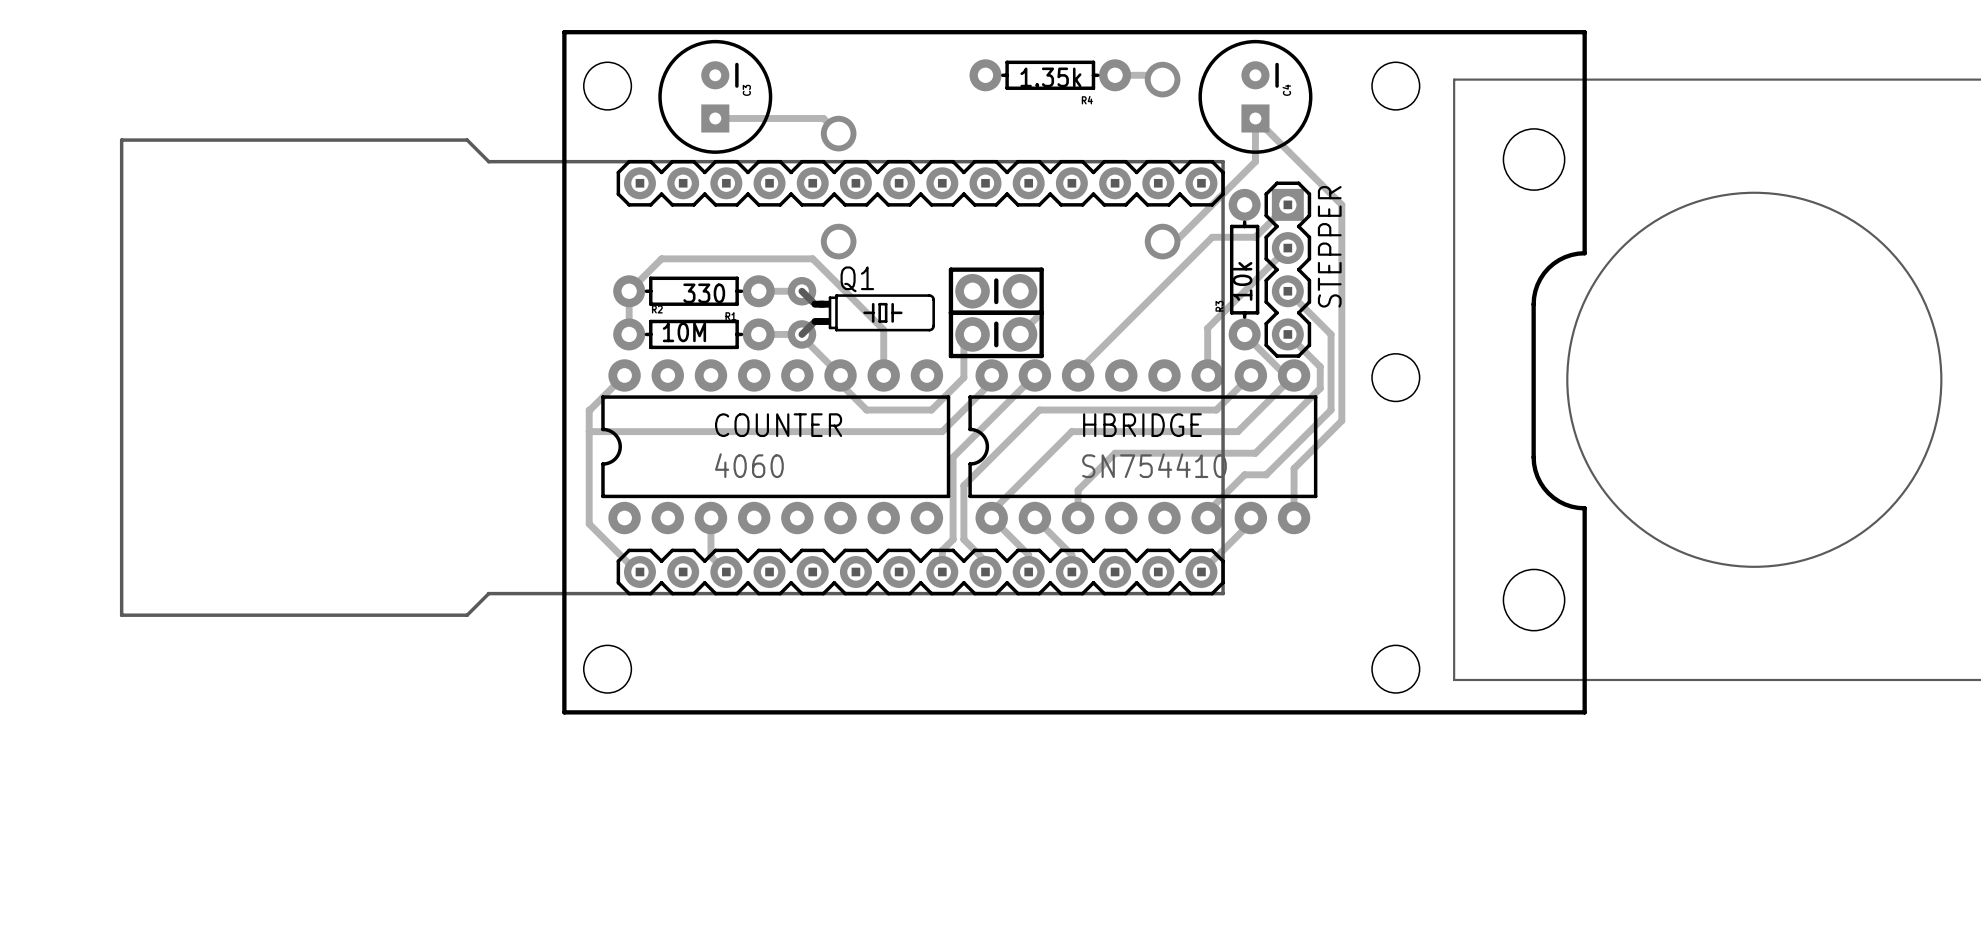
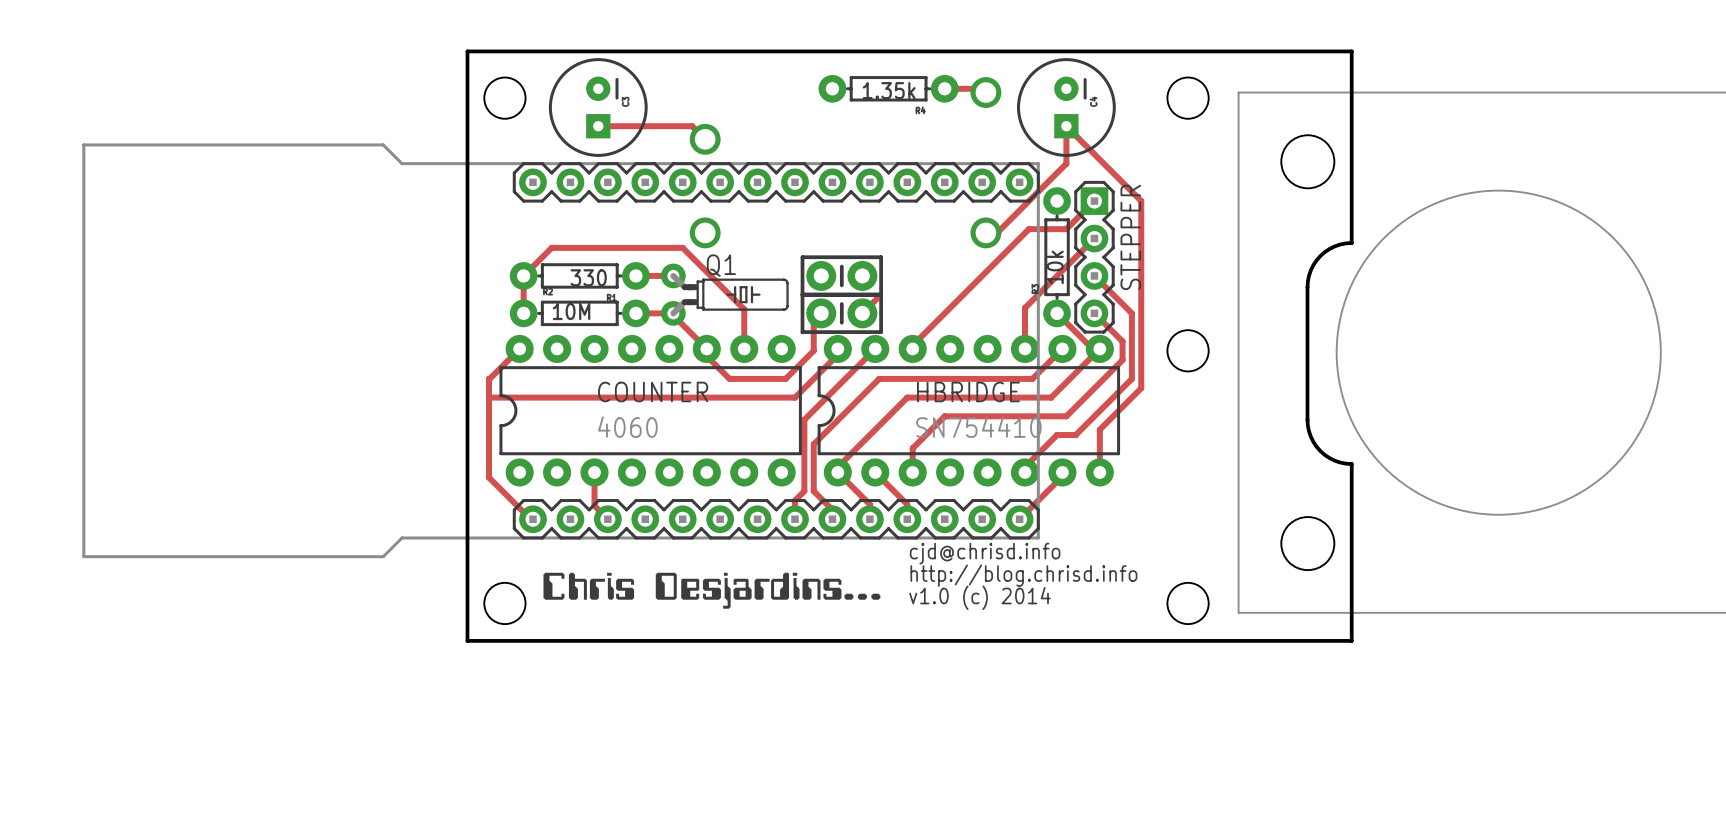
text: none -> cjd@chrisd.info (985, 553)
drawing: none -> [543, 572, 881, 609]
text: none -> http://blog.chrisd.info (1023, 575)
text: none -> v1.0 (c) 2014 (979, 597)

